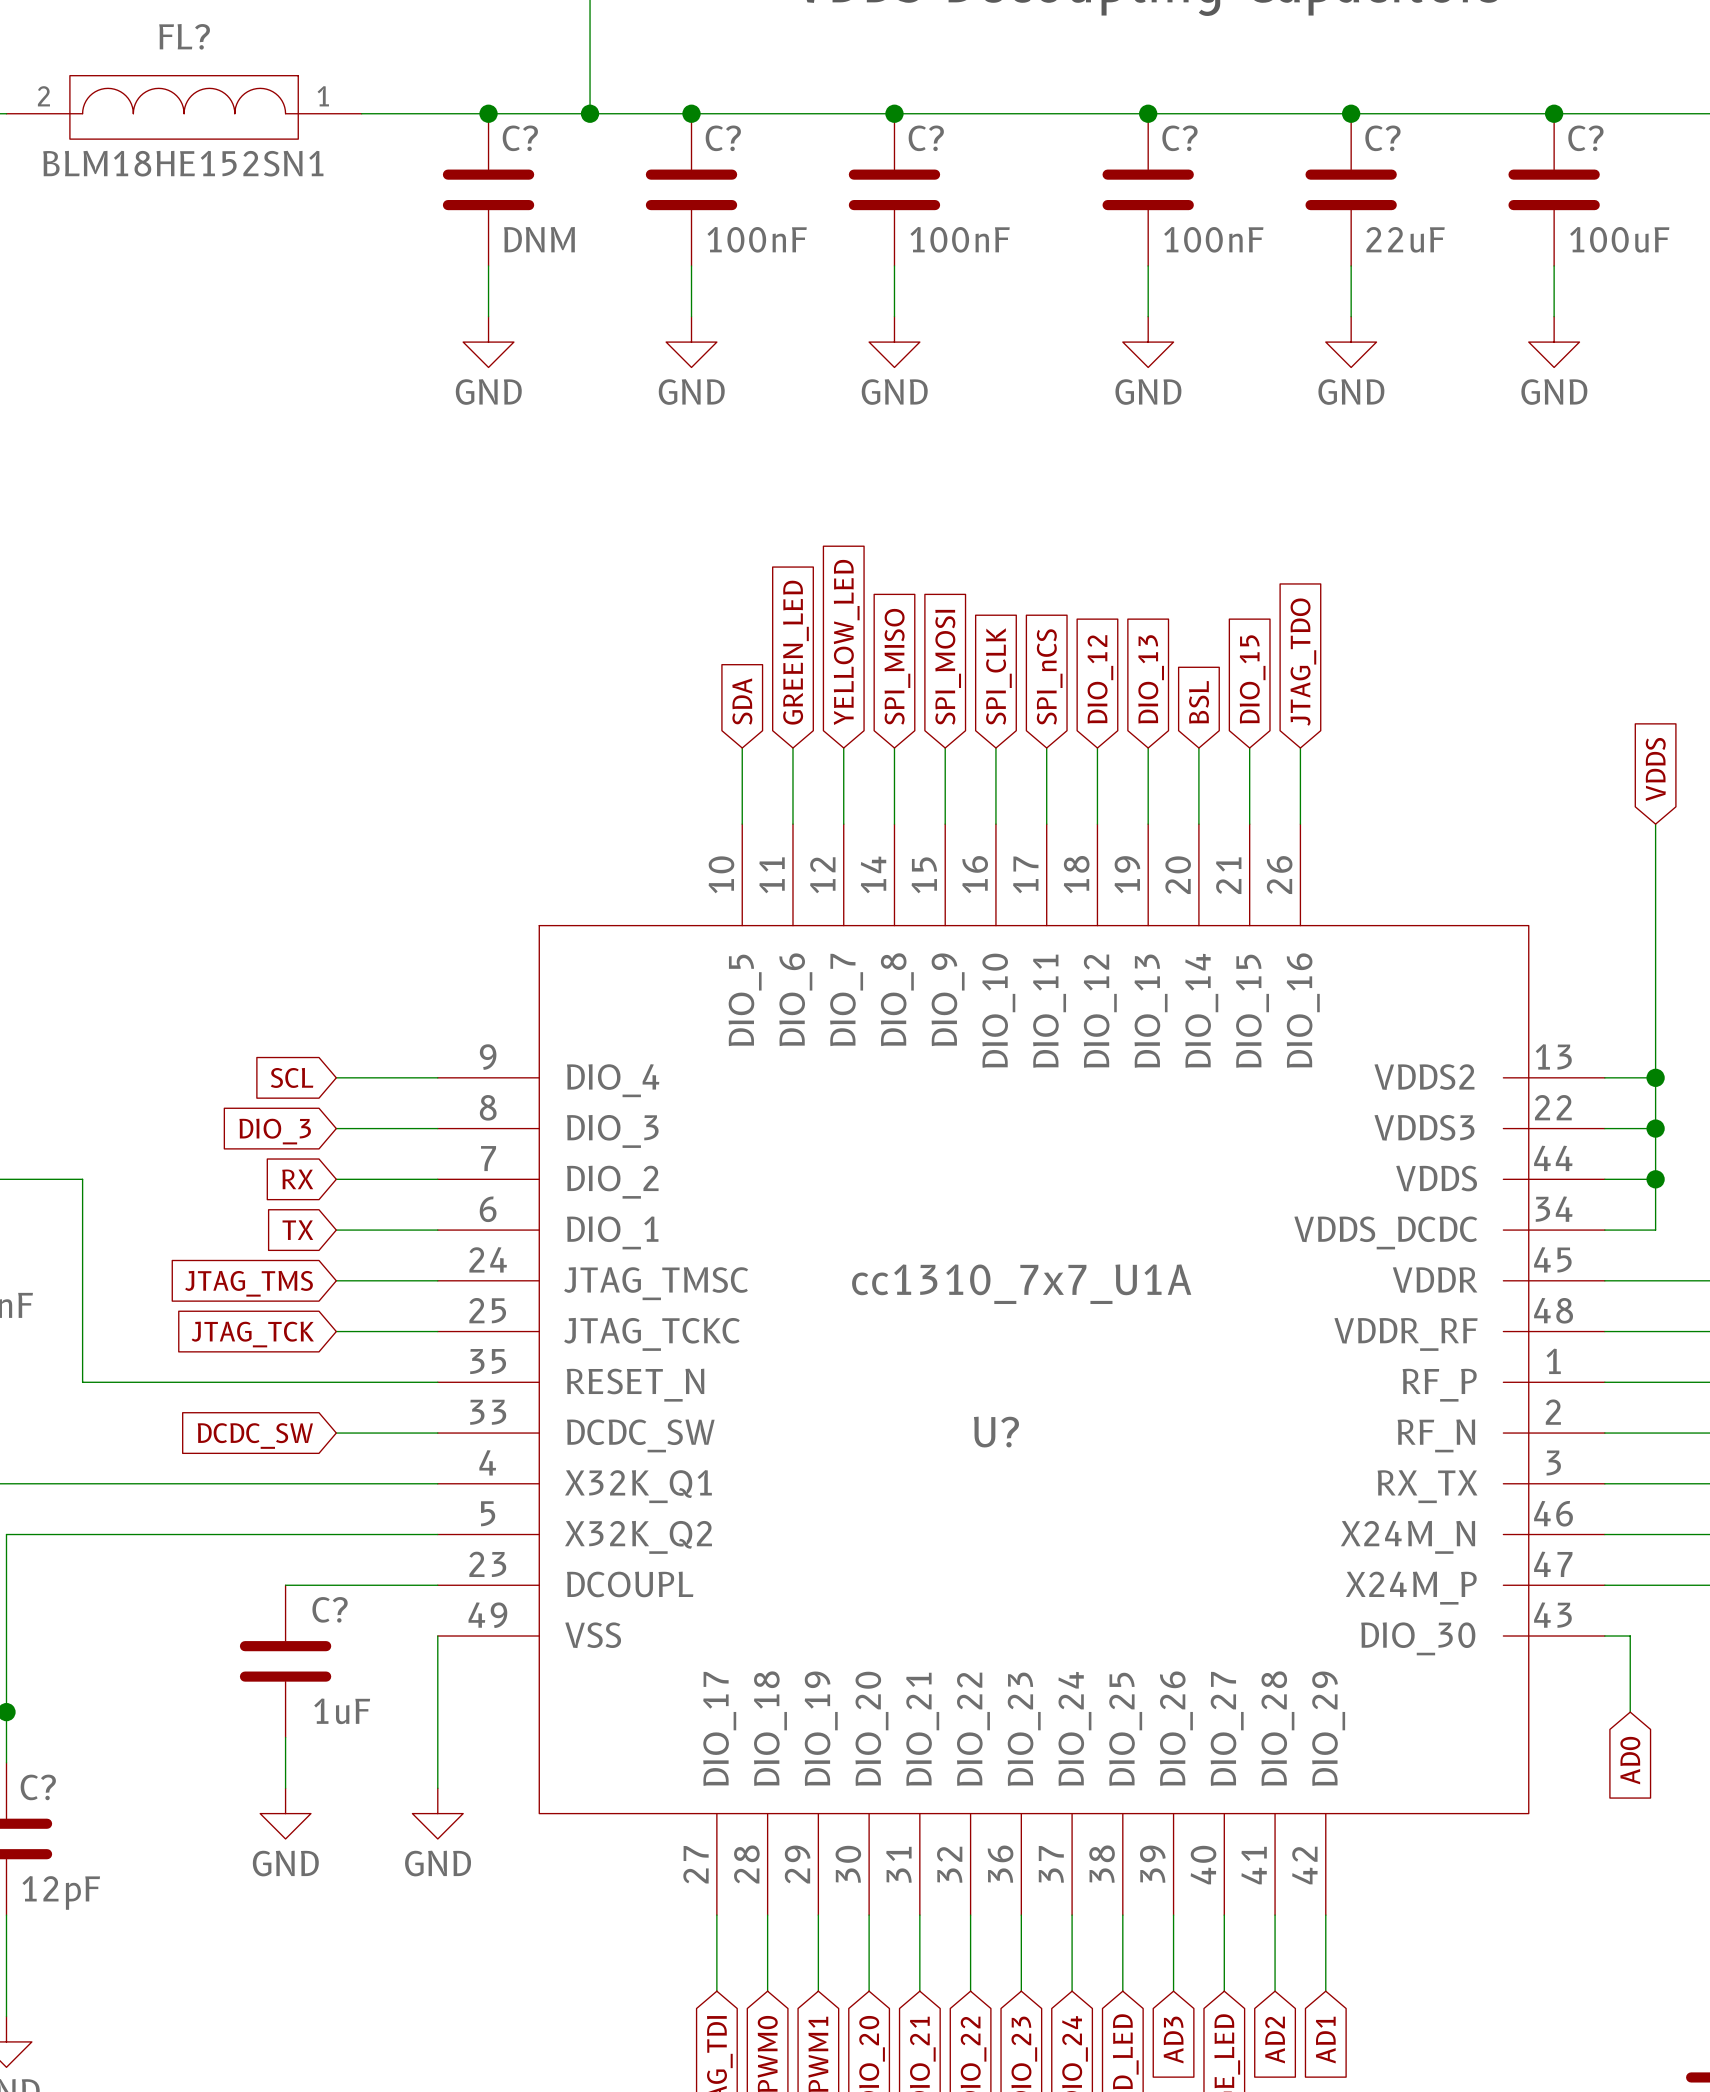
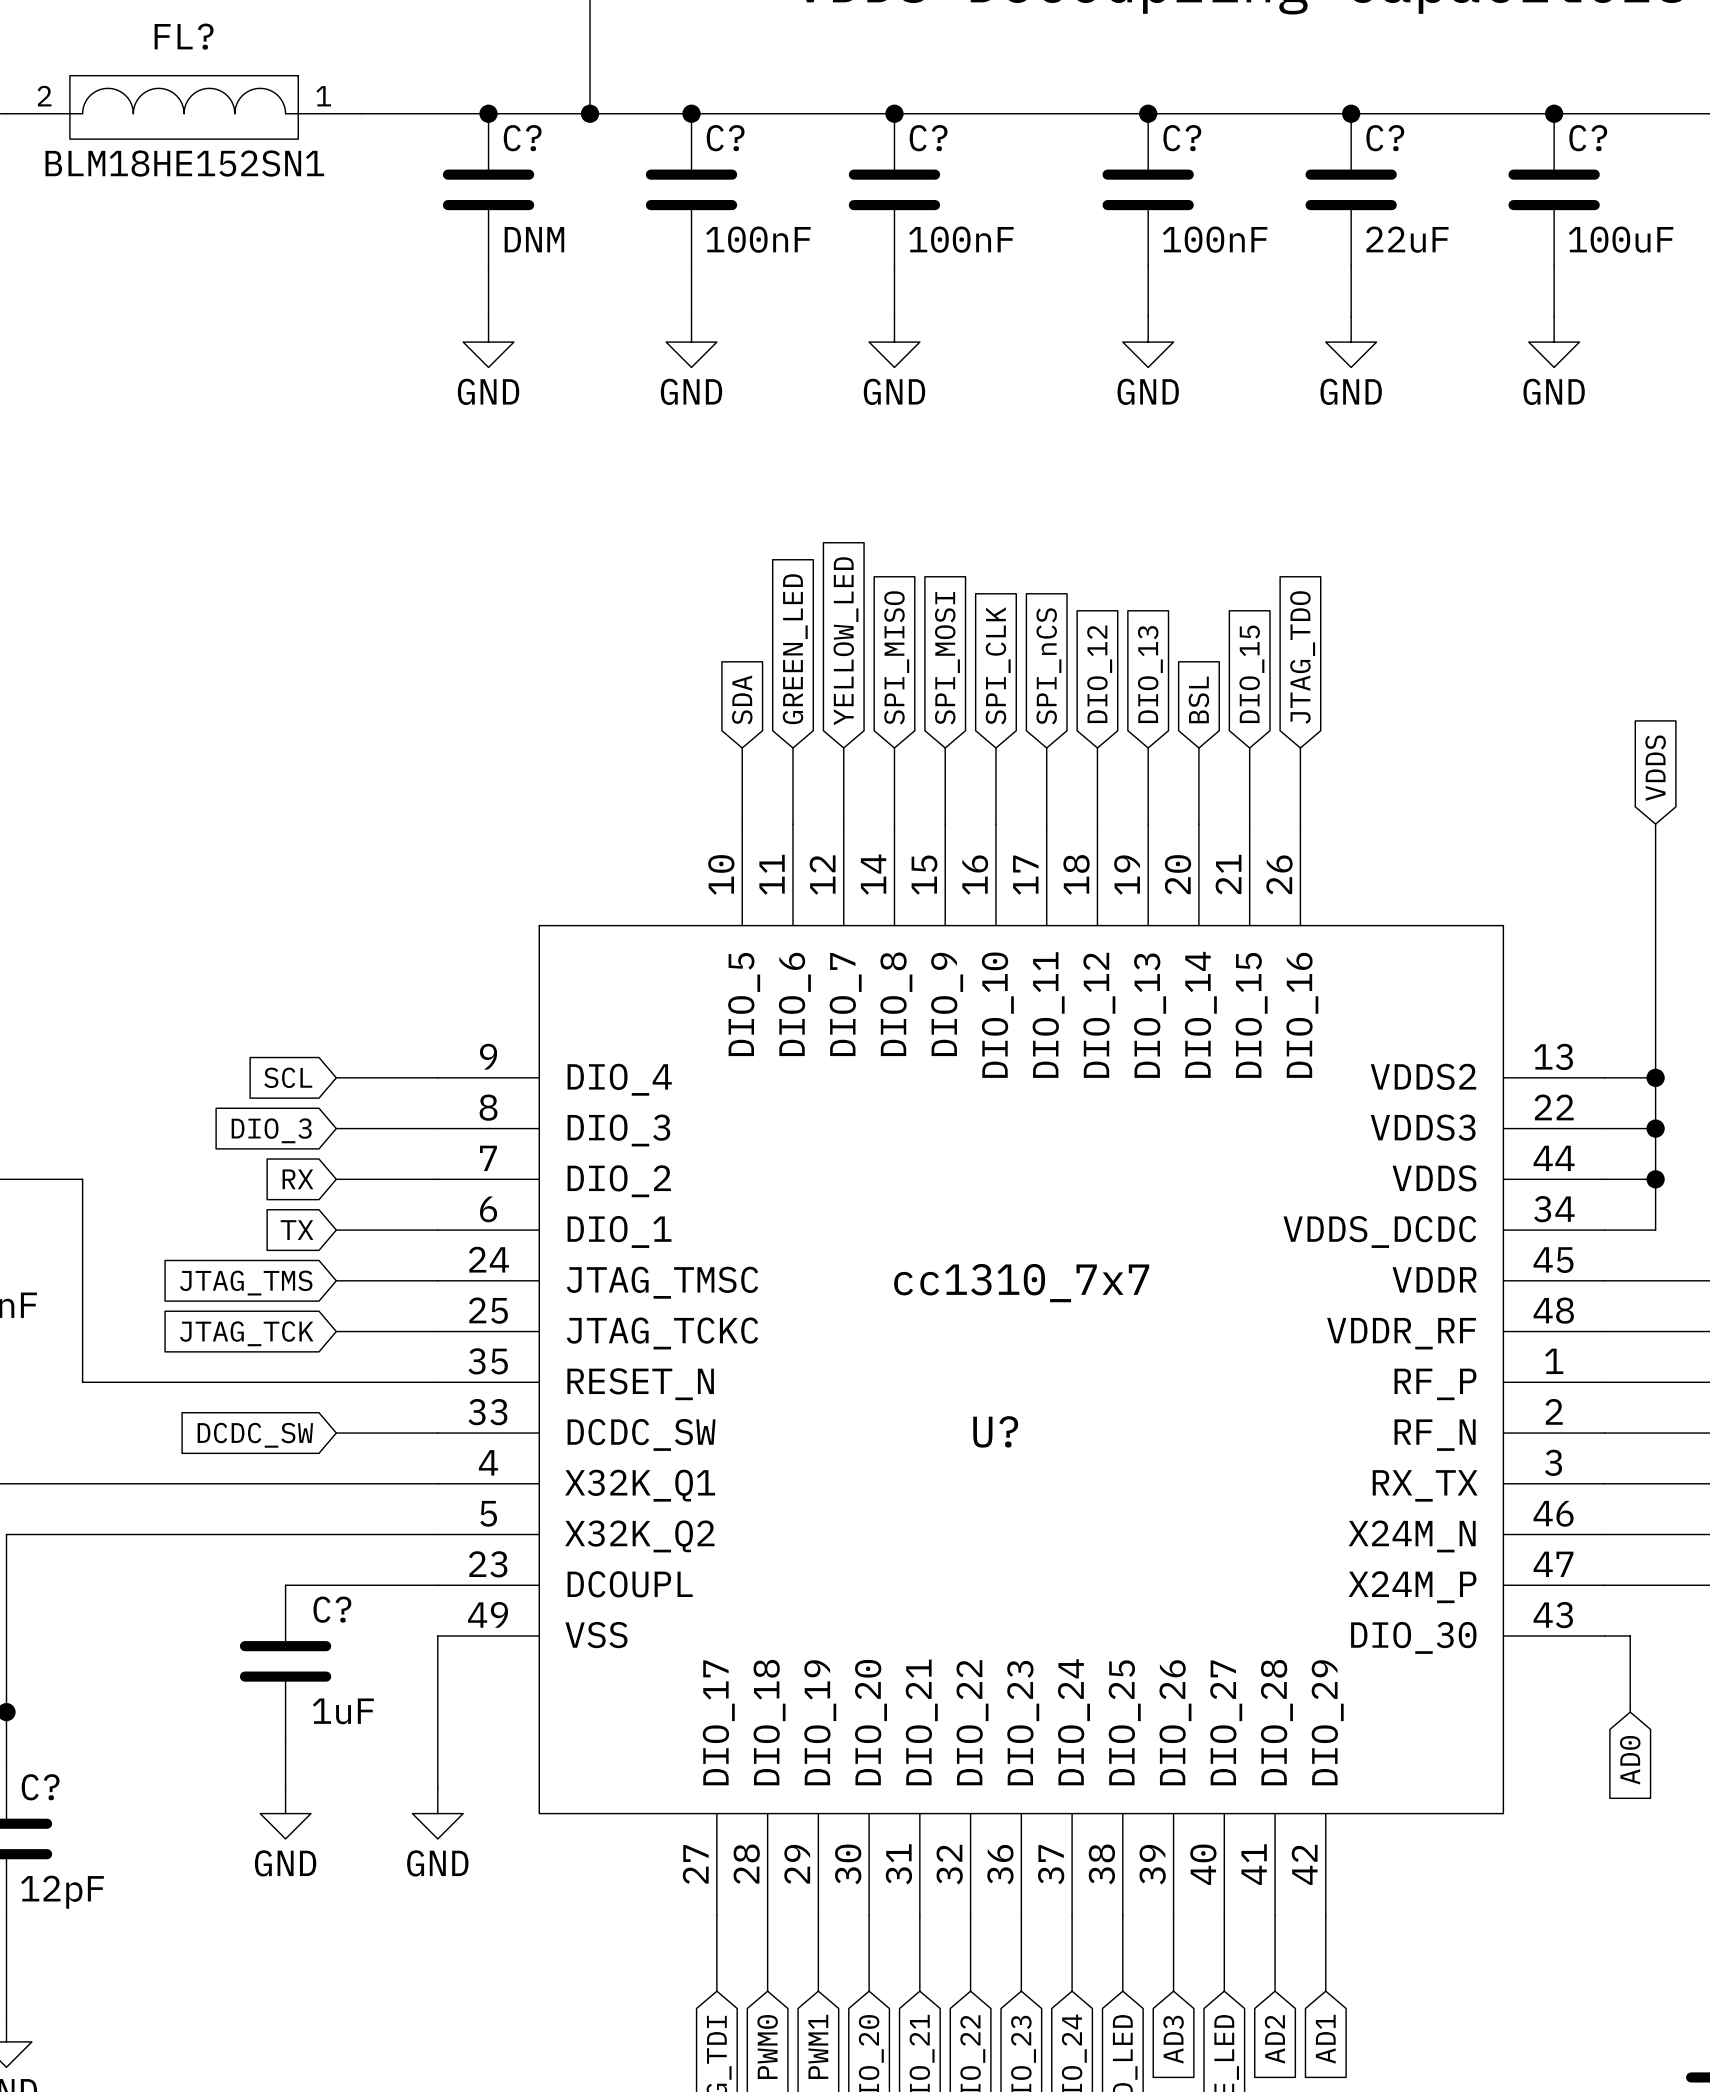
U? symbol: [437, 824, 1605, 1916] -> [437, 824, 1605, 1916]
U? value: cc1310_7x7_U1A (1021, 1284) -> cc1310_7x7 (1021, 1283)

